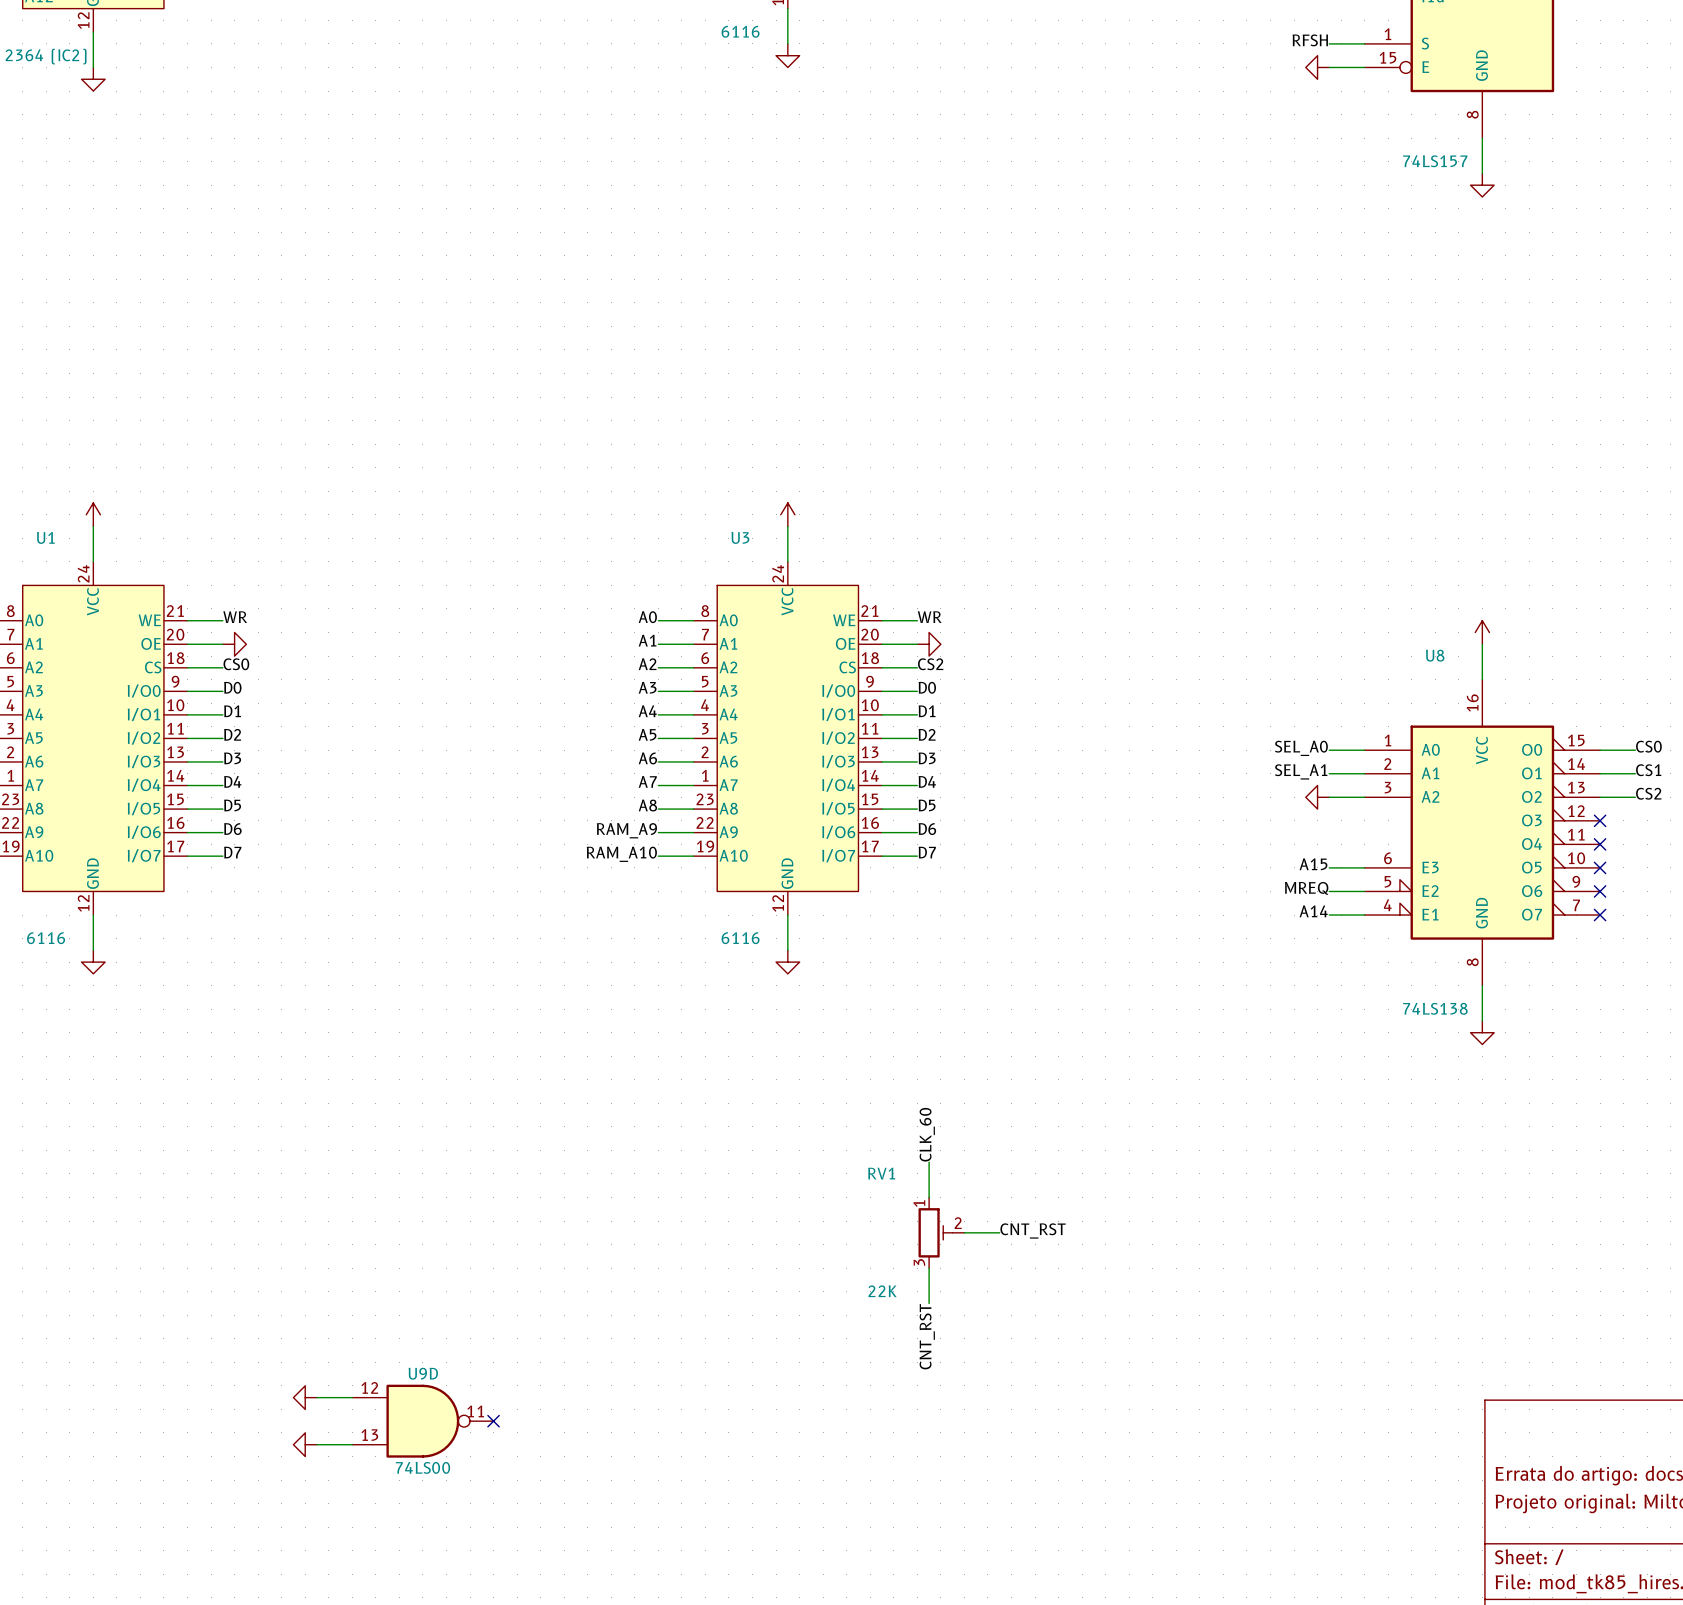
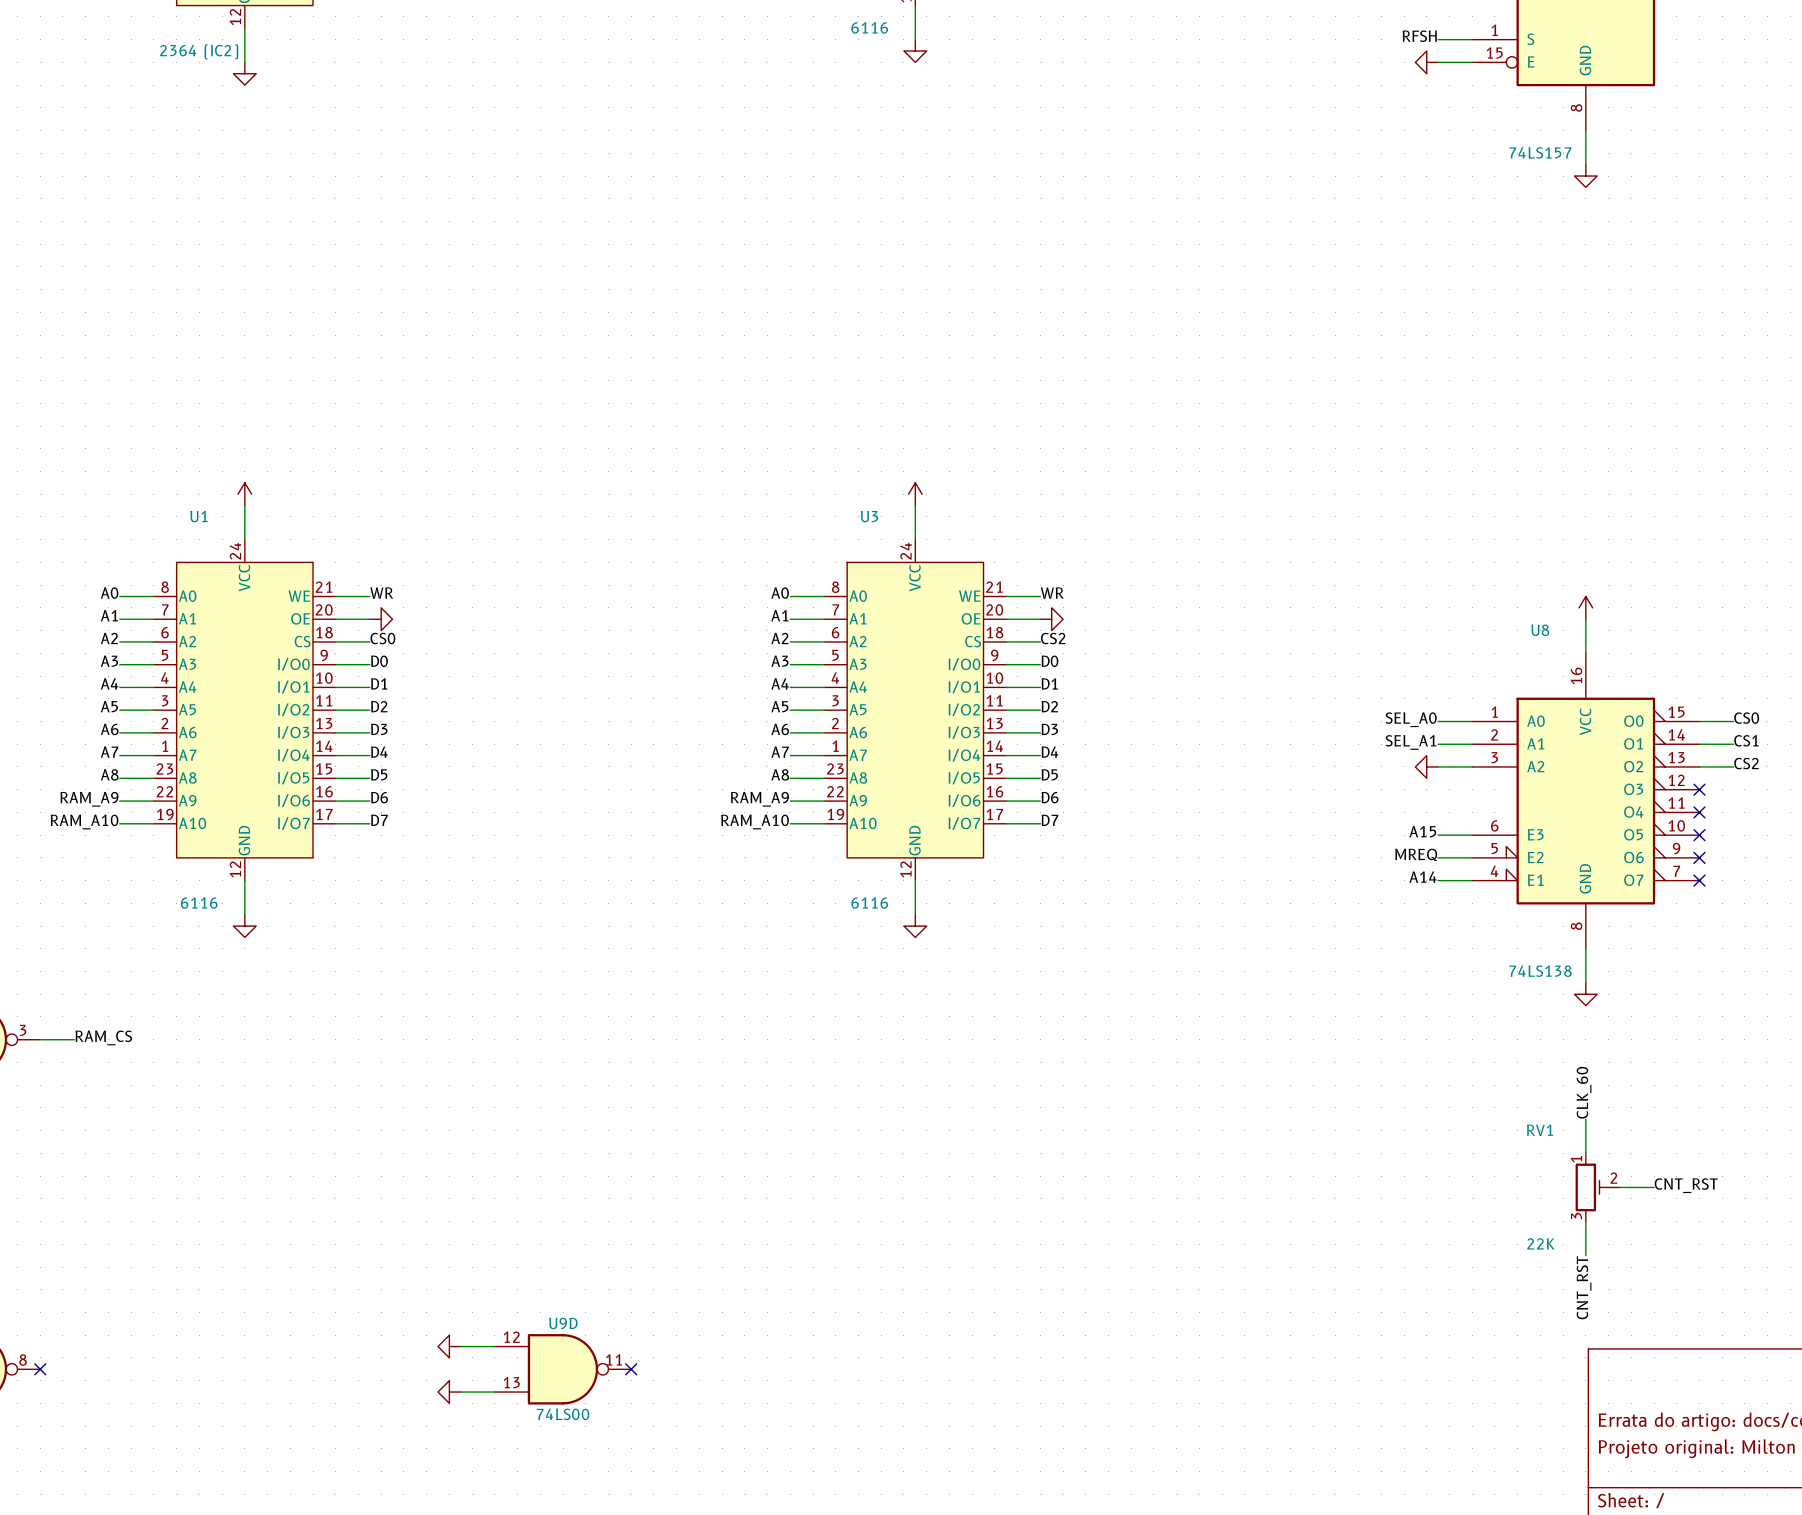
label: CLK_60 (927, 1134) -> none
label: none -> CLK_60 (1584, 1092)
wire: (929, 1162) (929, 1197) -> none
wire: none -> (1585, 1119) (1585, 1153)
label: CNT_RST (1033, 1230) -> none
label: none -> CNT_RST (1686, 1185)
RV1 position: (941, 1232) -> (1597, 1187)
wire: (964, 1232) (999, 1232) -> none
wire: none -> (1619, 1187) (1654, 1187)
wire: (929, 1268) (929, 1303) -> none
wire: none -> (1585, 1221) (1585, 1255)
label: CNT_RST (927, 1336) -> none
label: none -> CNT_RST (1584, 1287)

